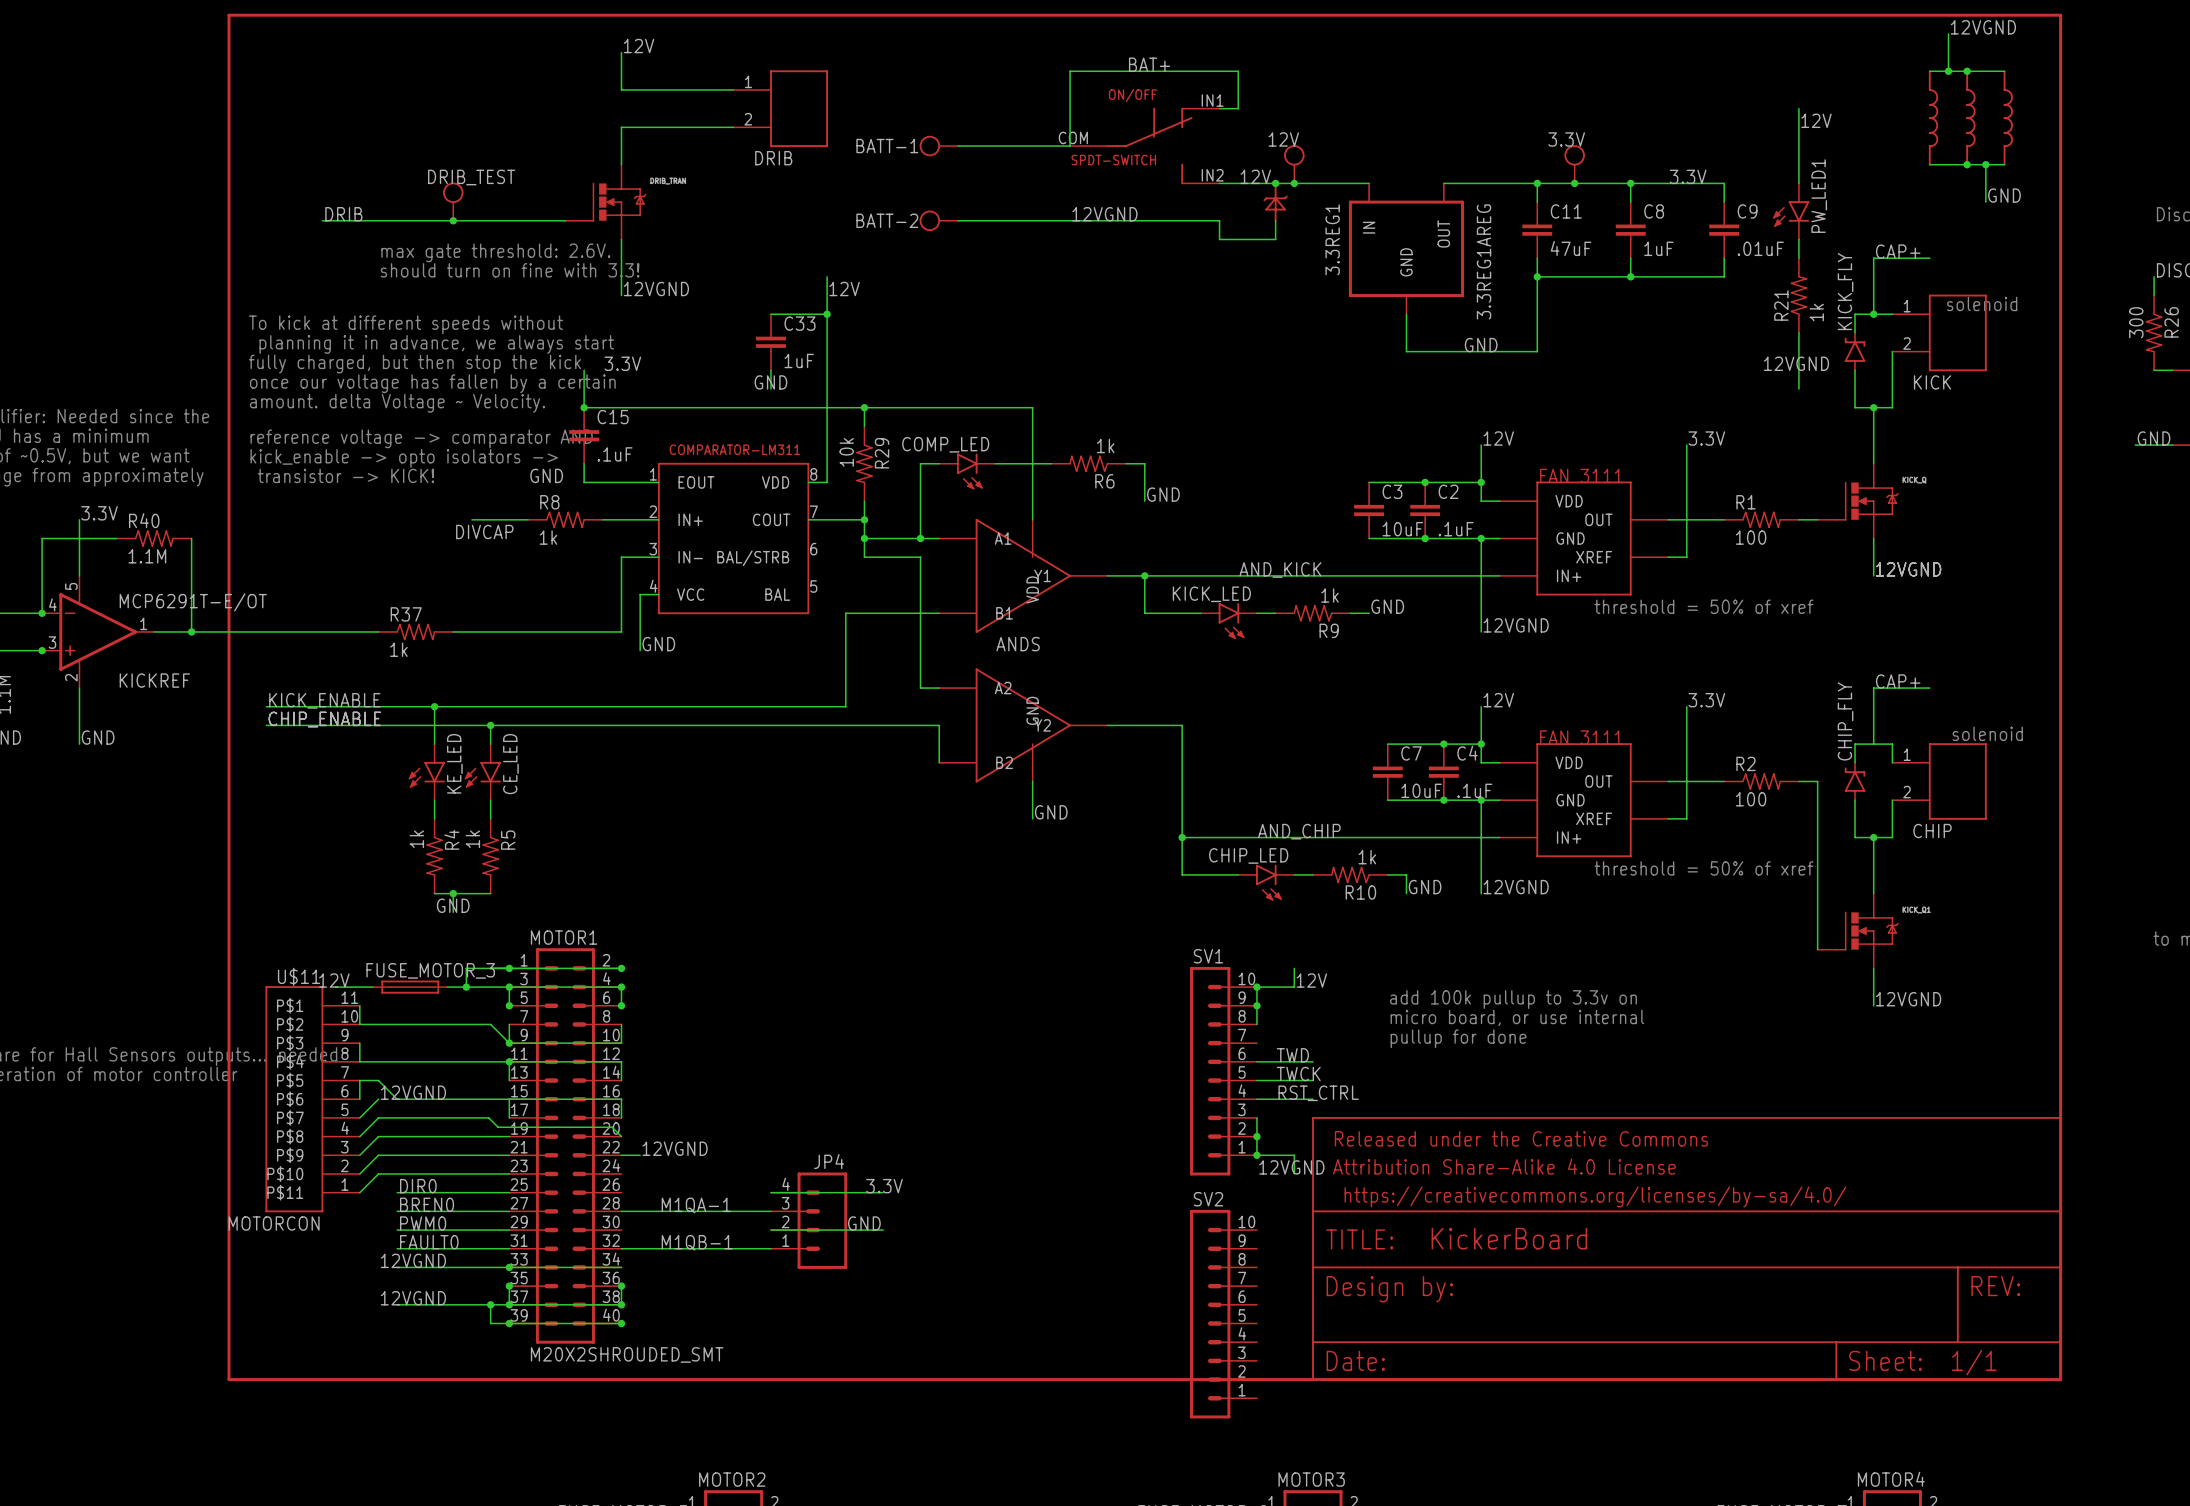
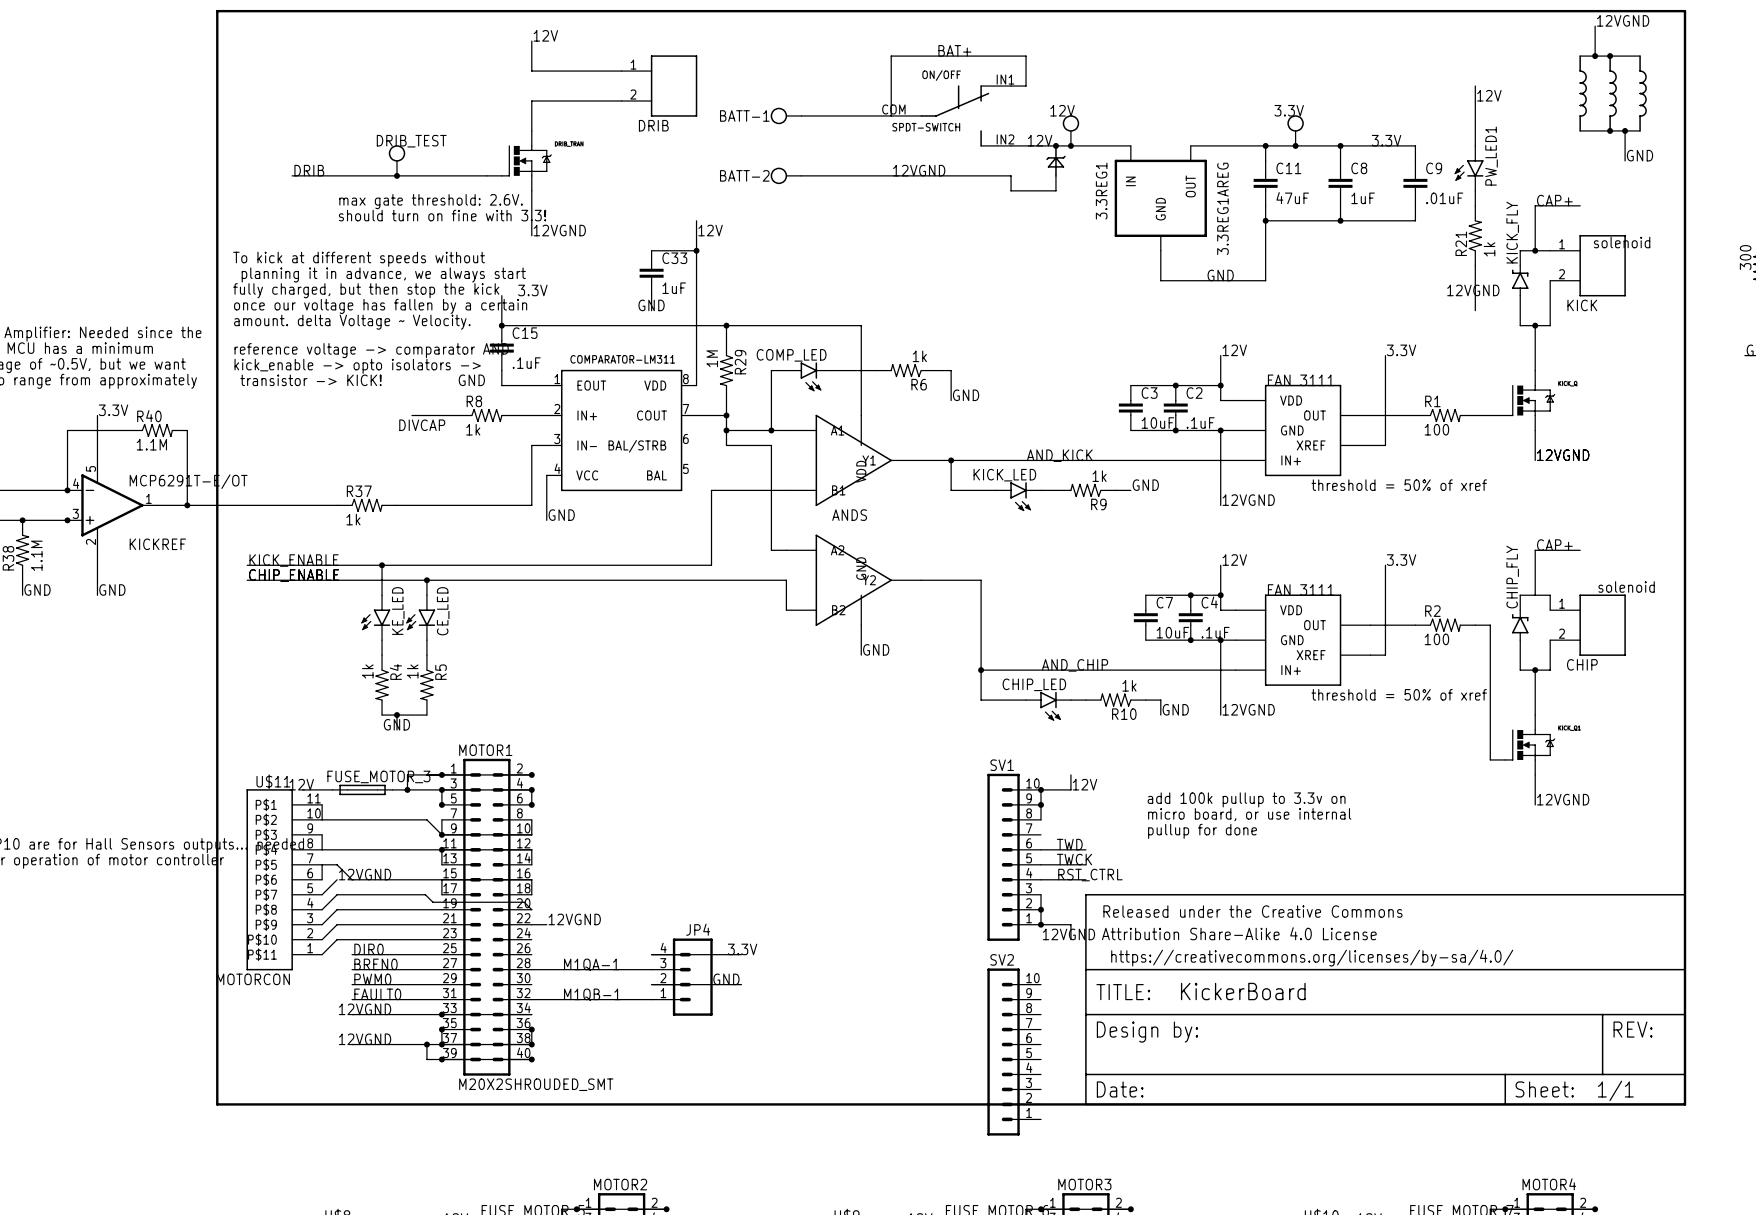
R29 value: 10k (846, 452) -> 1M (712, 358)

